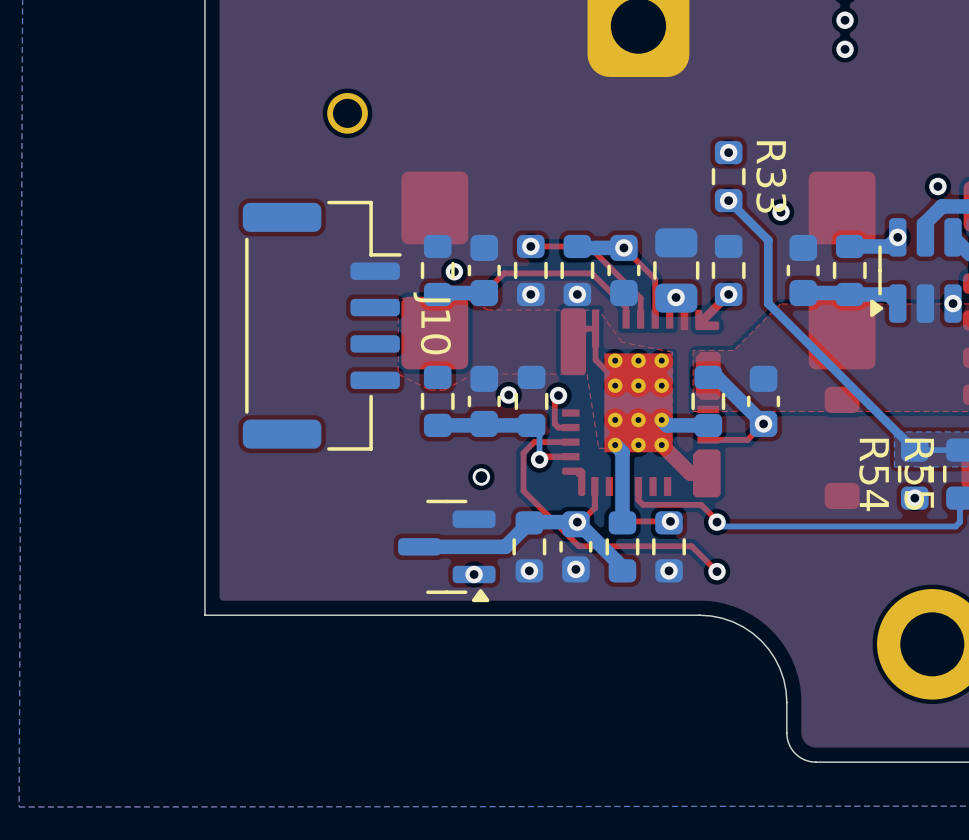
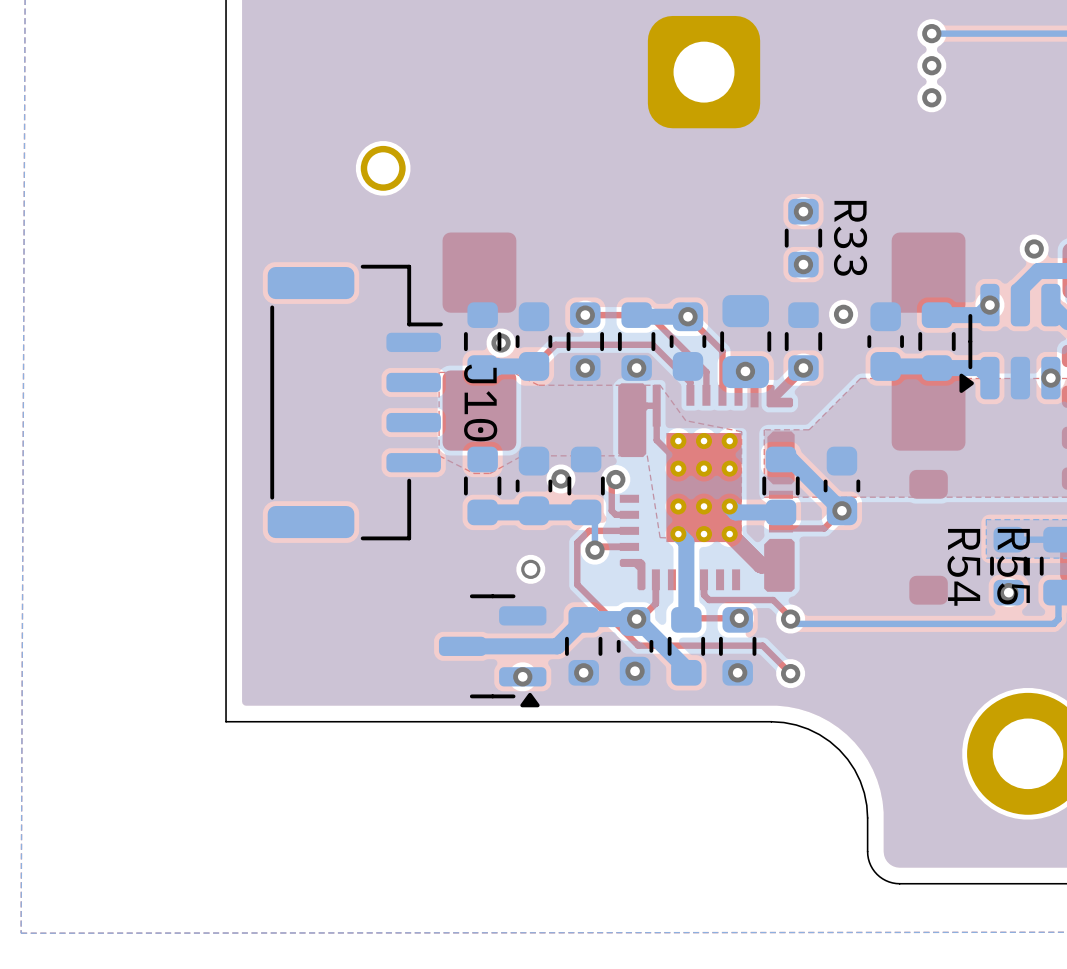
bottom track: (728, 200) (768, 240) (768, 303) (914, 450) -> none
via position: (781, 212) -> (843, 314)

